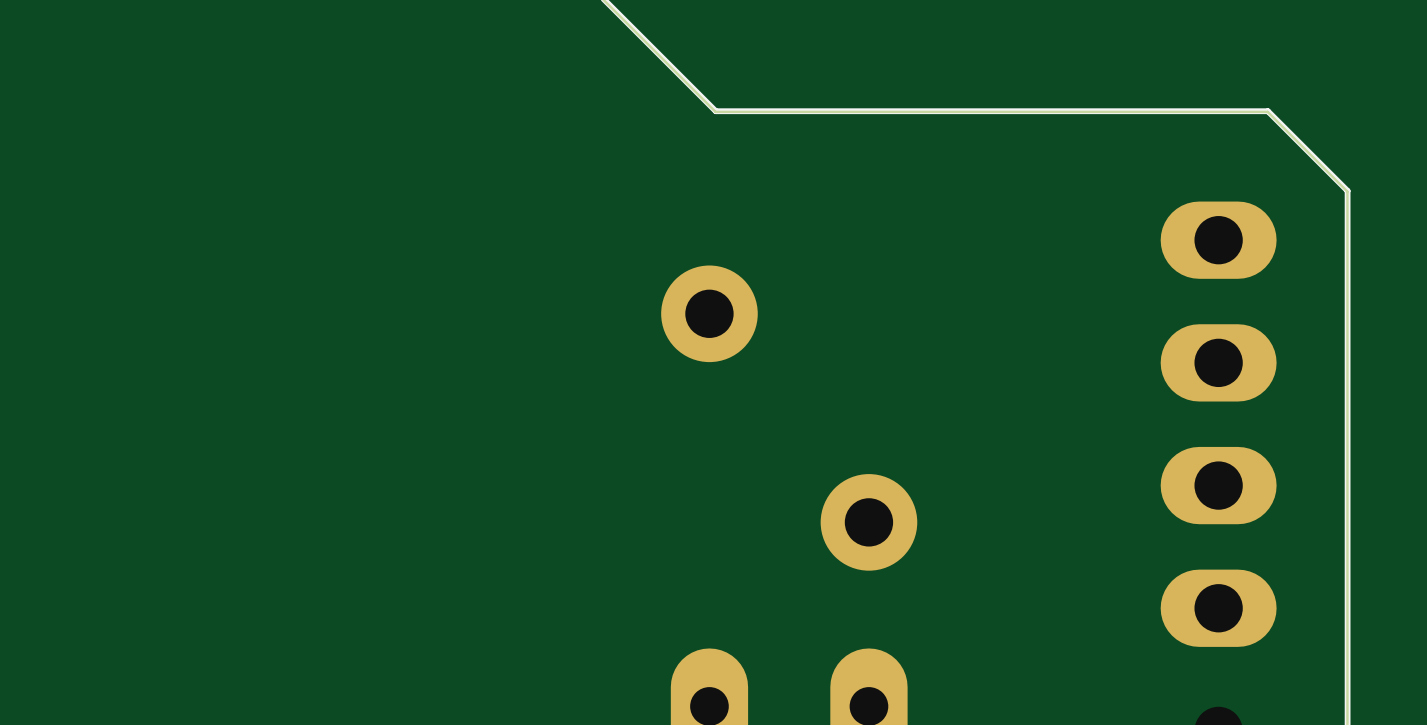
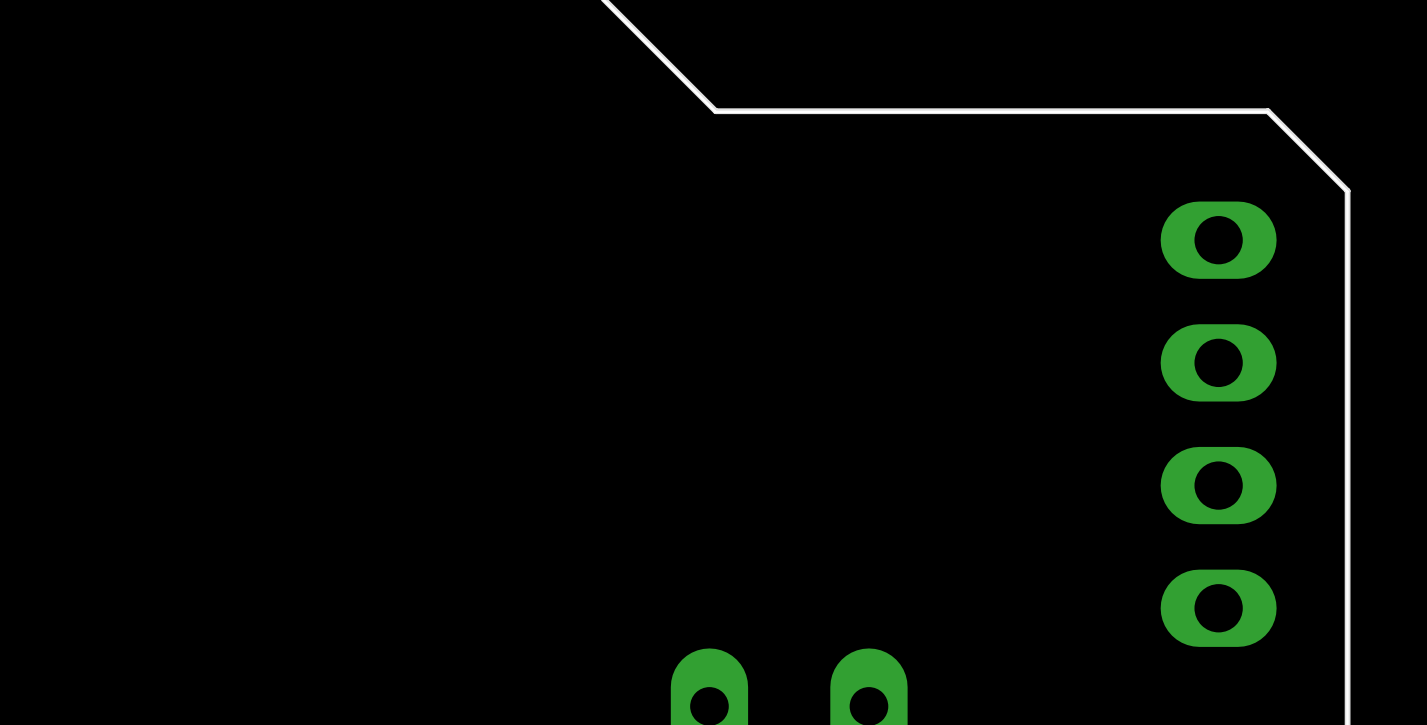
part: (709, 313) -> none
part: (868, 522) -> none

